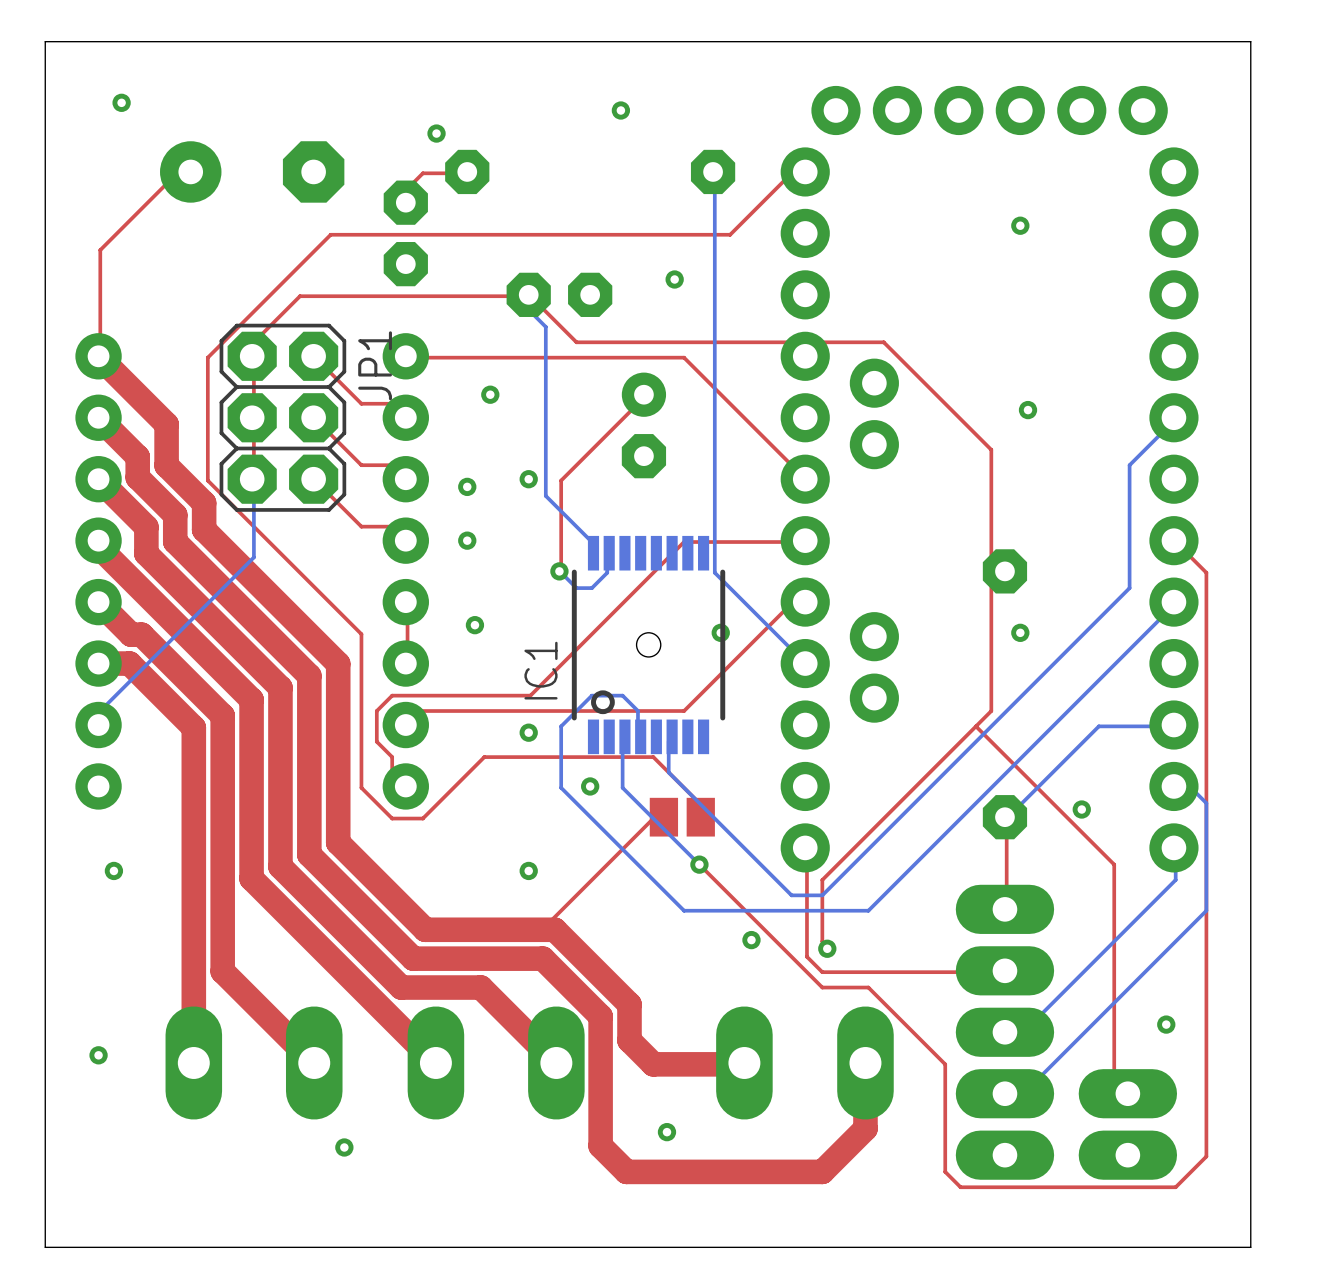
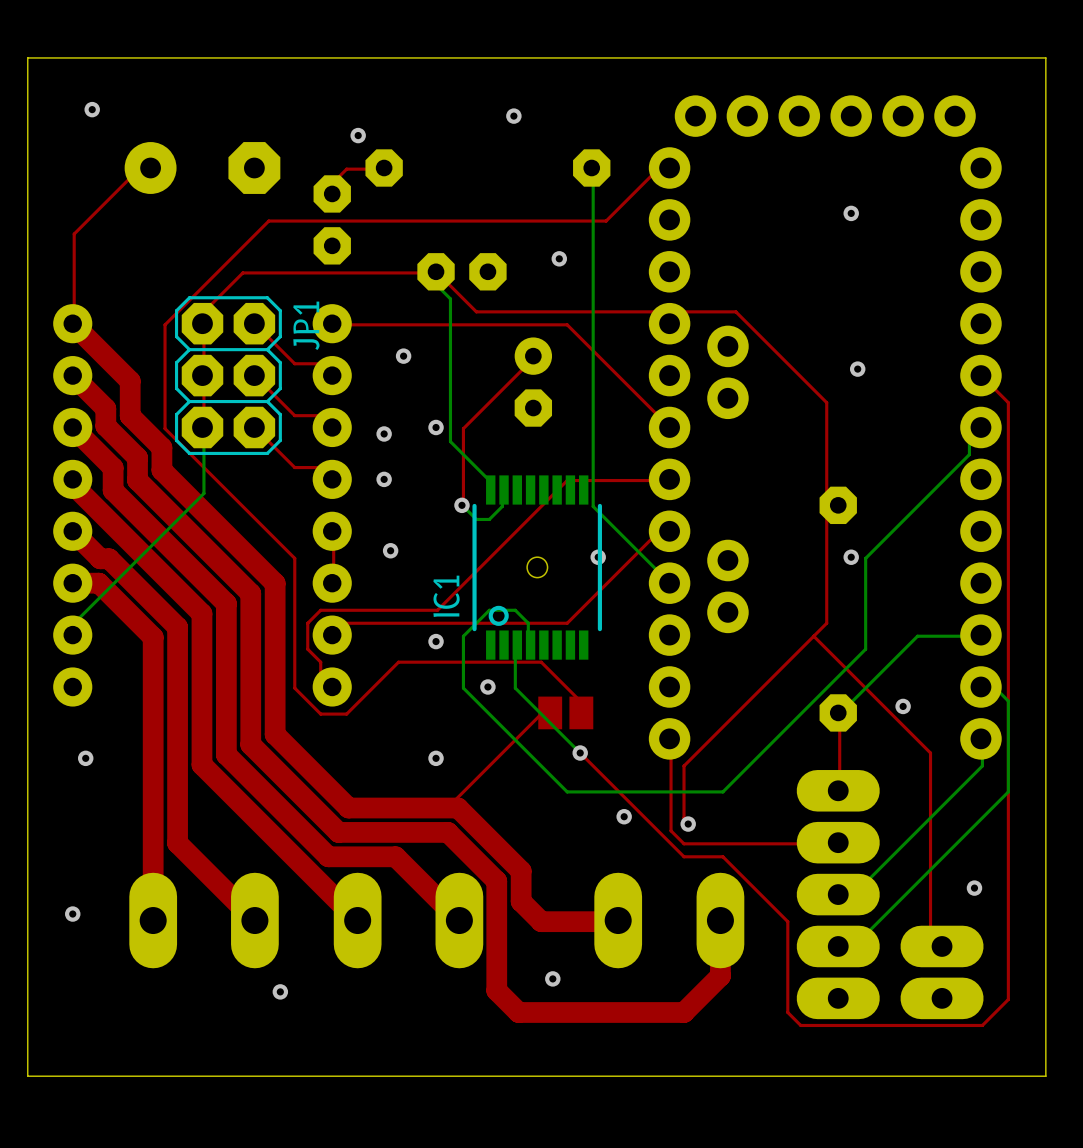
bottom track: (1173, 417) (1175, 419) (1129, 465) (1129, 588) (822, 895) (791, 895) (668, 772) (668, 741) (672, 736) -> none
top track: (1173, 540) (1206, 572) -> (980, 375) (1008, 402) (1008, 506)
bottom track: (1173, 602) (1175, 603) (1037, 741) -> (980, 427) (969, 428) (969, 454) (865, 558) (865, 649)

